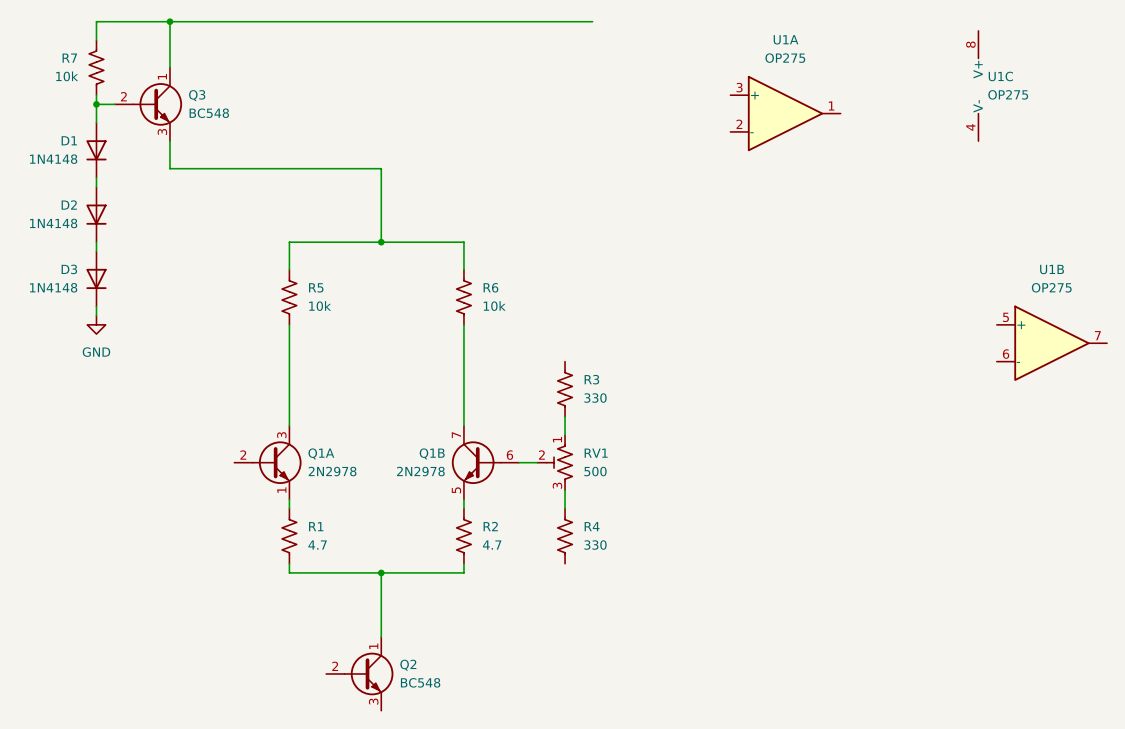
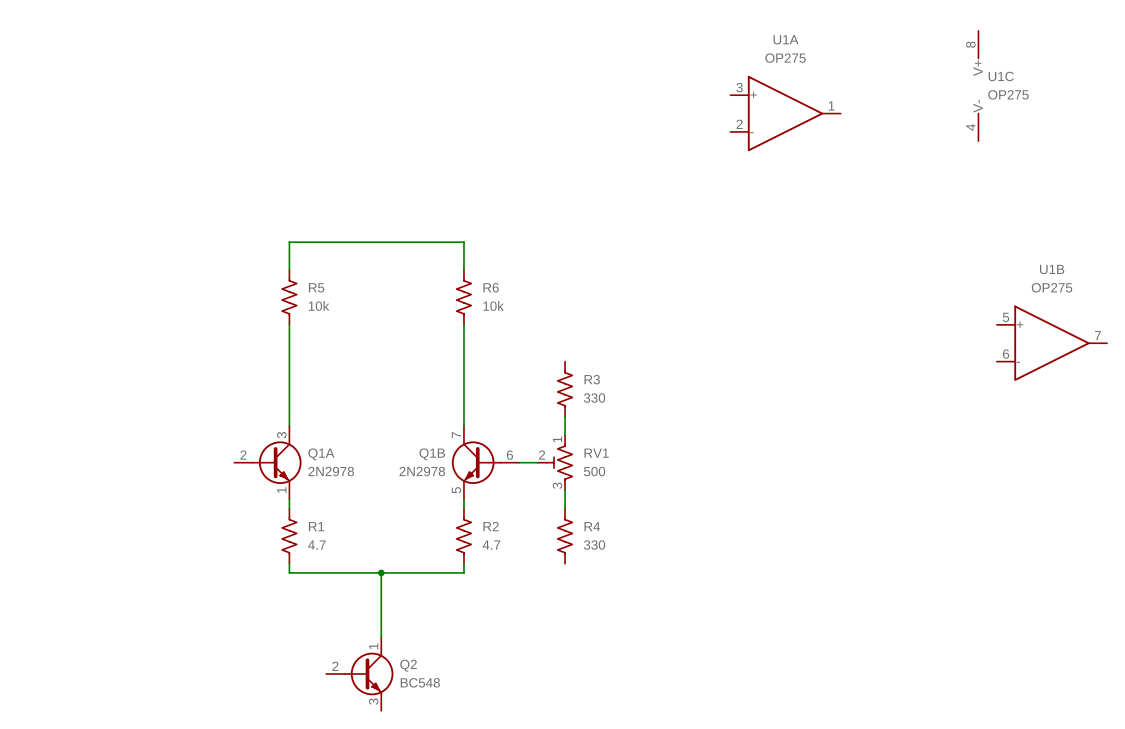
wire: (169, 21) (169, 67) -> none
junction: (169, 21) -> none
wire: (592, 21) (96, 21) (96, 40) -> none
R7: 10k (96, 67) -> none
wire: (96, 95) (96, 122) -> none
wire: (96, 104) (114, 104) -> none
junction: (96, 104) -> none
Q3: BC548 (148, 104) -> none
wire: (169, 141) (169, 168) (381, 168) (381, 242) -> none
D1: 1N4148 (96, 150) -> none
wire: (96, 177) (96, 187) -> none
D2: 1N4148 (96, 214) -> none
wire: (96, 242) (96, 251) -> none
junction: (381, 242) -> none
D3: 1N4148 (96, 278) -> none
wire: (96, 306) (96, 315) -> none
power symbol: GND (96, 324) -> none

